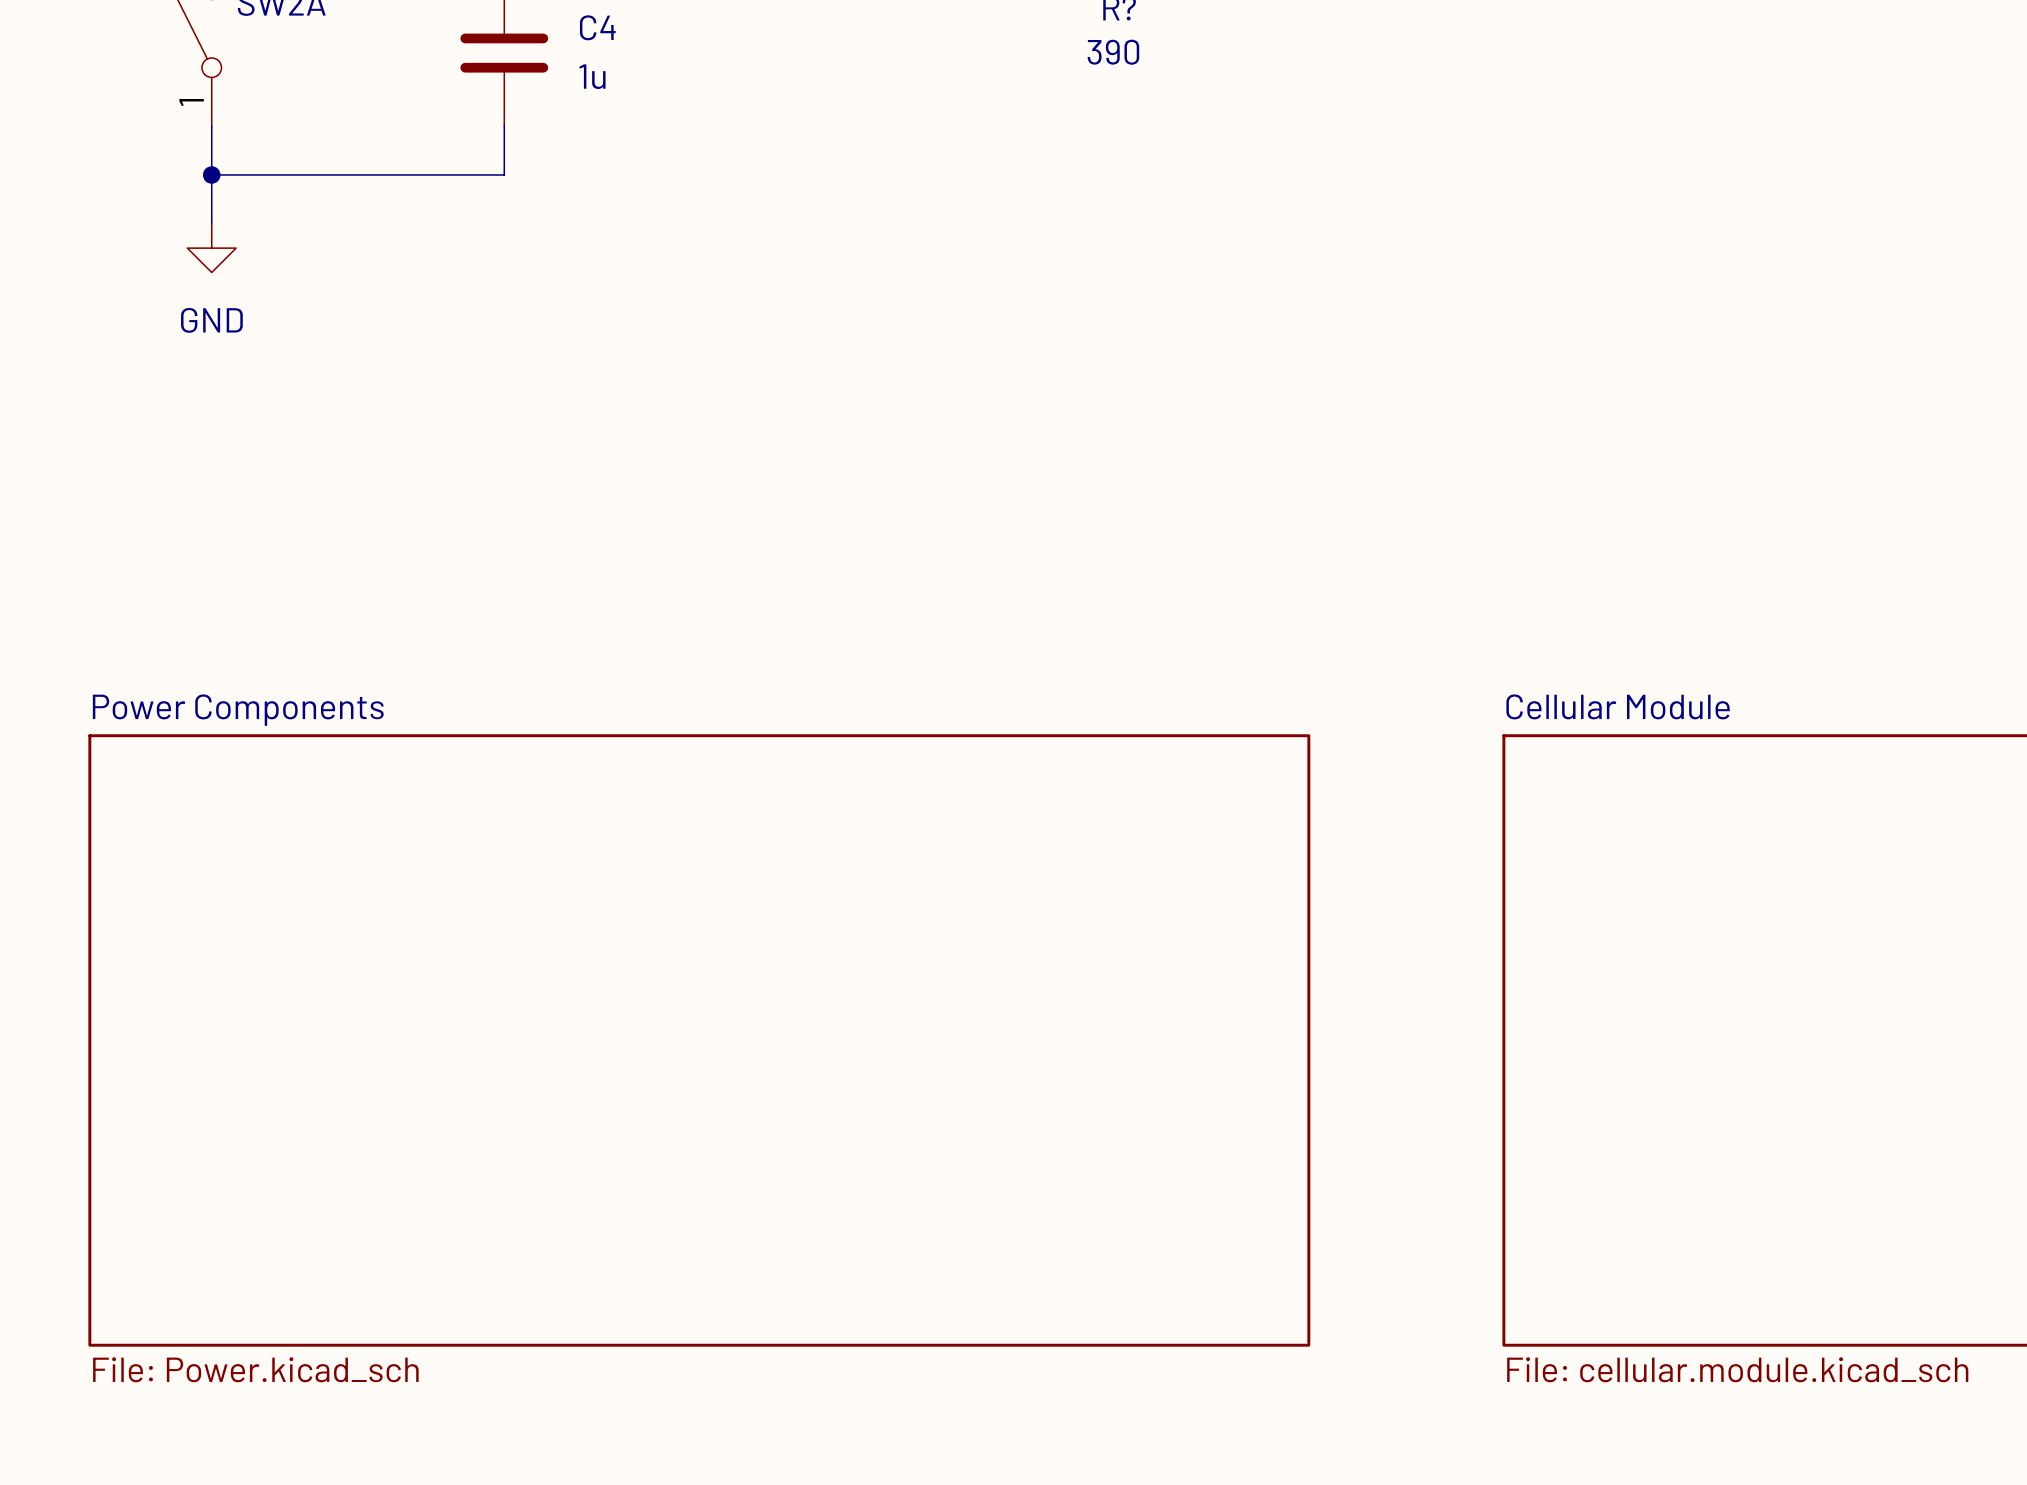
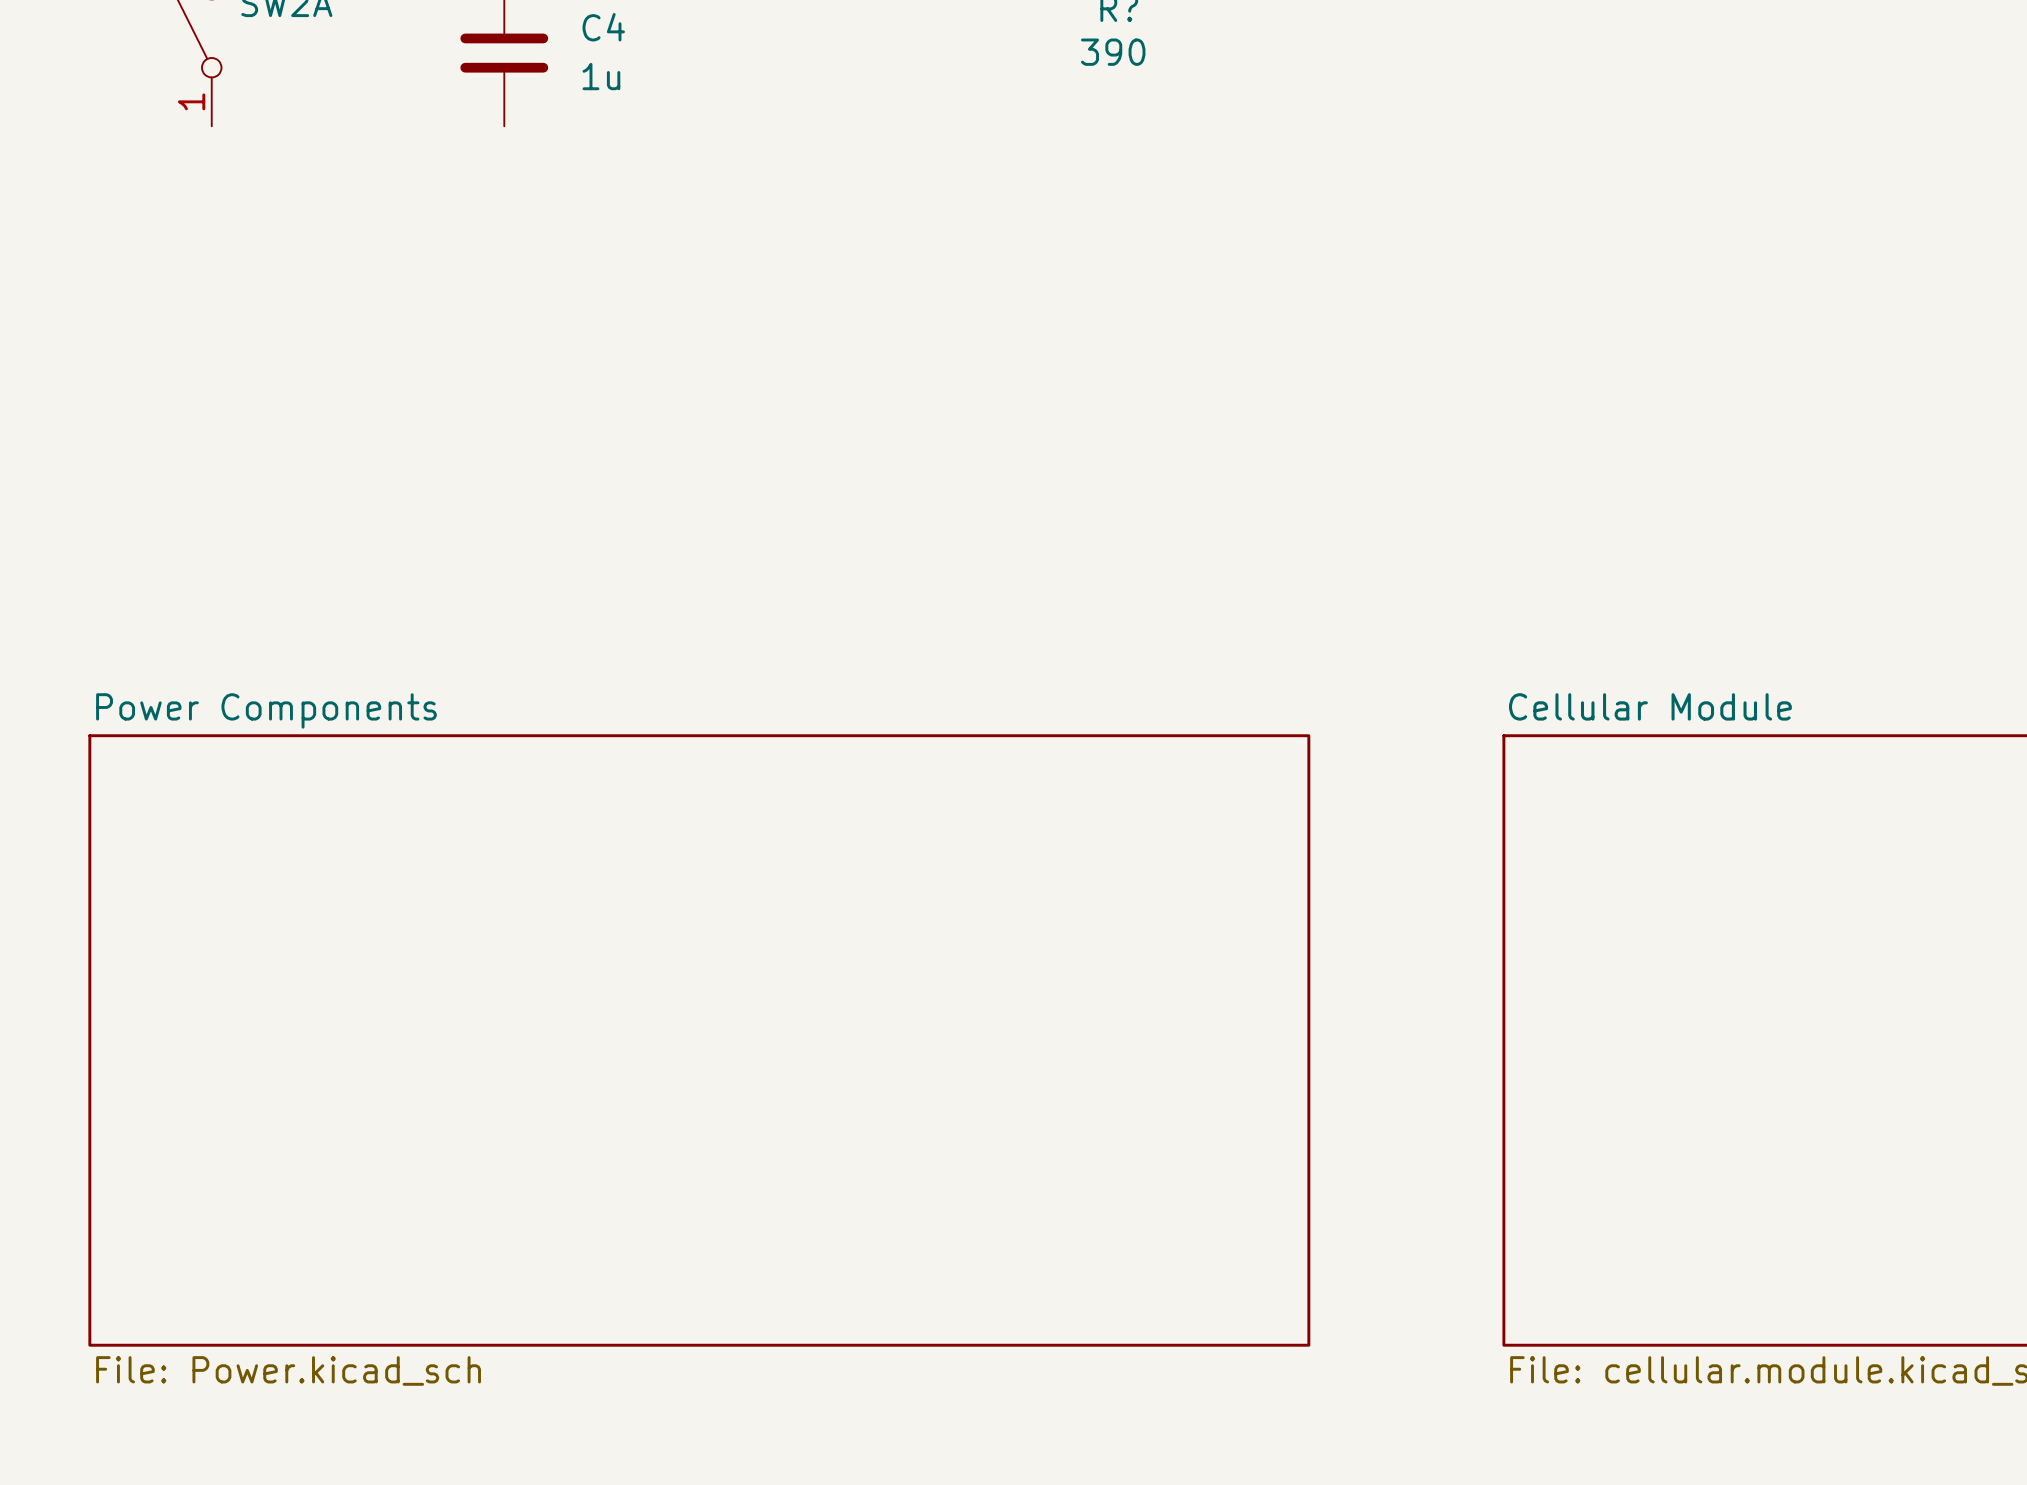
wire: (211, 126) (211, 223) -> none
wire: (504, 126) (504, 174) (211, 174) -> none
junction: (211, 174) -> none
power symbol: GND (211, 248) -> none

